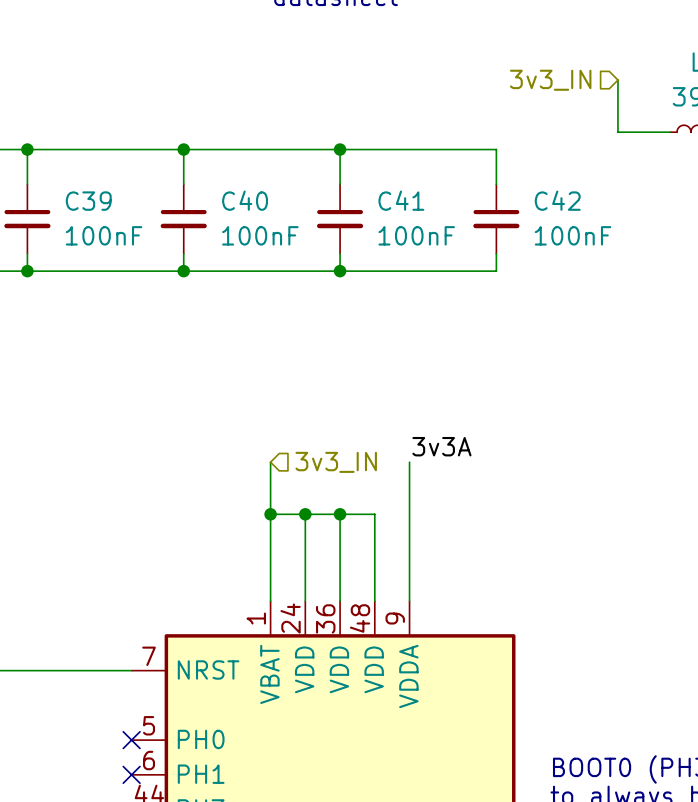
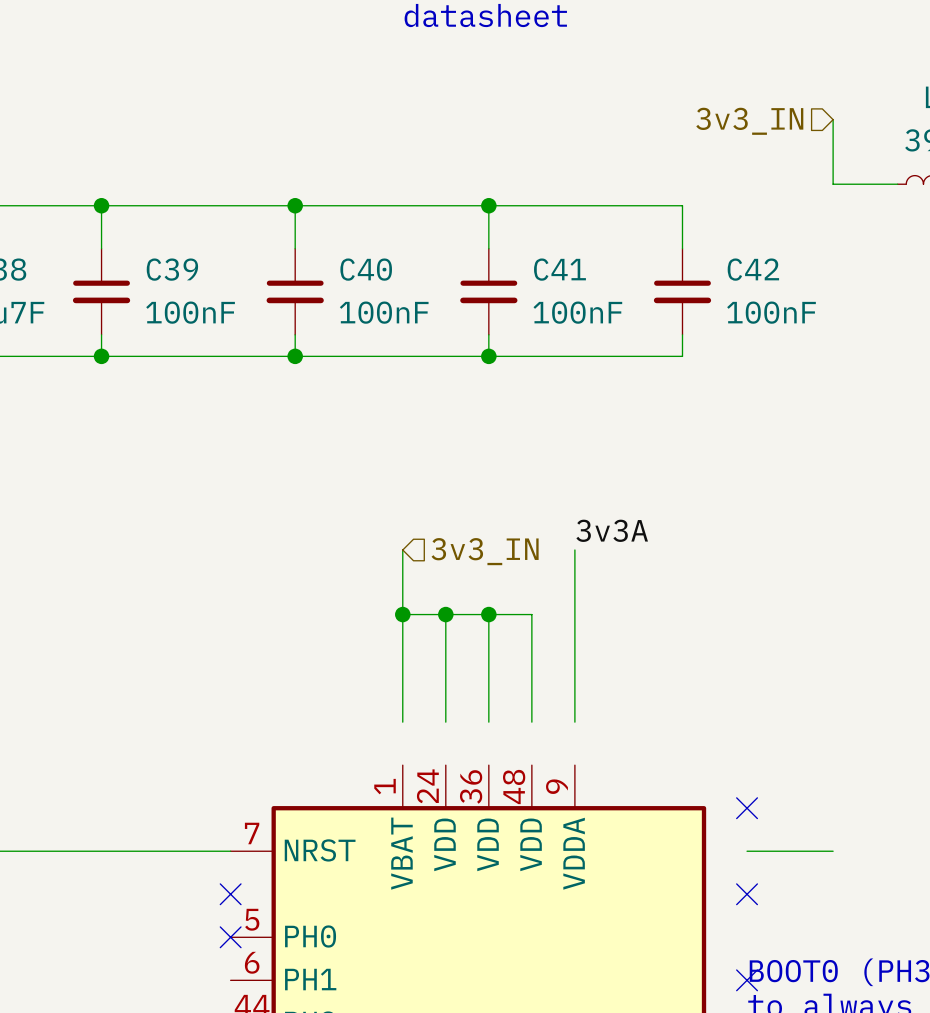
label position: 3v3A (441, 446) -> 3v3A (612, 530)
hierarchical label position: 3v3_IN (336, 462) -> 3v3_IN (485, 551)
junction: none -> (402, 614)
junction: none -> (445, 614)
junction: none -> (488, 614)
wire: (270, 514) (374, 514) -> (402, 614) (531, 614) (531, 657)
junction: (270, 514) -> none
junction: (305, 514) -> none
junction: (340, 514) -> none
wire: (270, 566) (270, 601) -> (402, 550) (402, 593)
wire: (305, 566) (305, 601) -> (445, 614) (445, 657)
wire: (340, 566) (340, 601) -> (488, 614) (488, 657)
wire: (374, 566) (374, 601) -> none
wire: (409, 566) (409, 601) -> (574, 550) (574, 593)
no-connect mark: none -> (747, 808)
wire: none -> (747, 851) (833, 851)
no-connect mark: none -> (747, 894)
no-connect mark position: (131, 774) -> (230, 894)
no-connect mark: none -> (747, 980)

